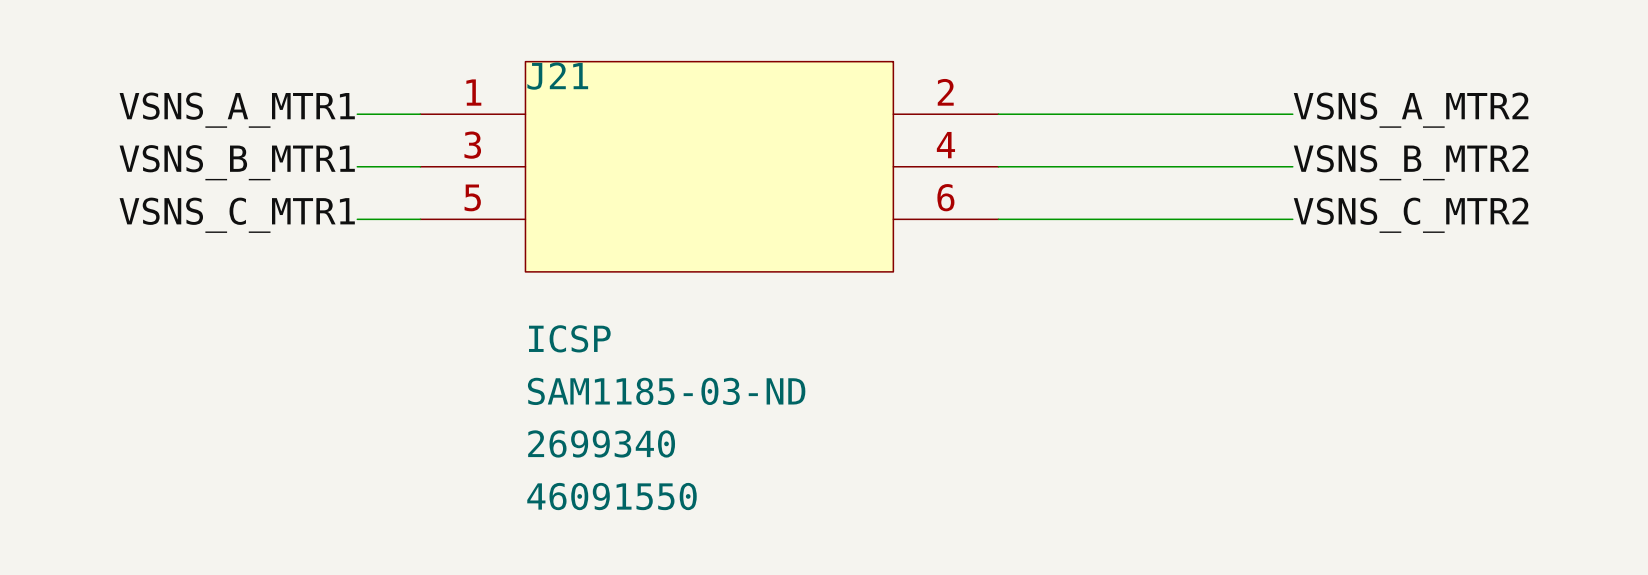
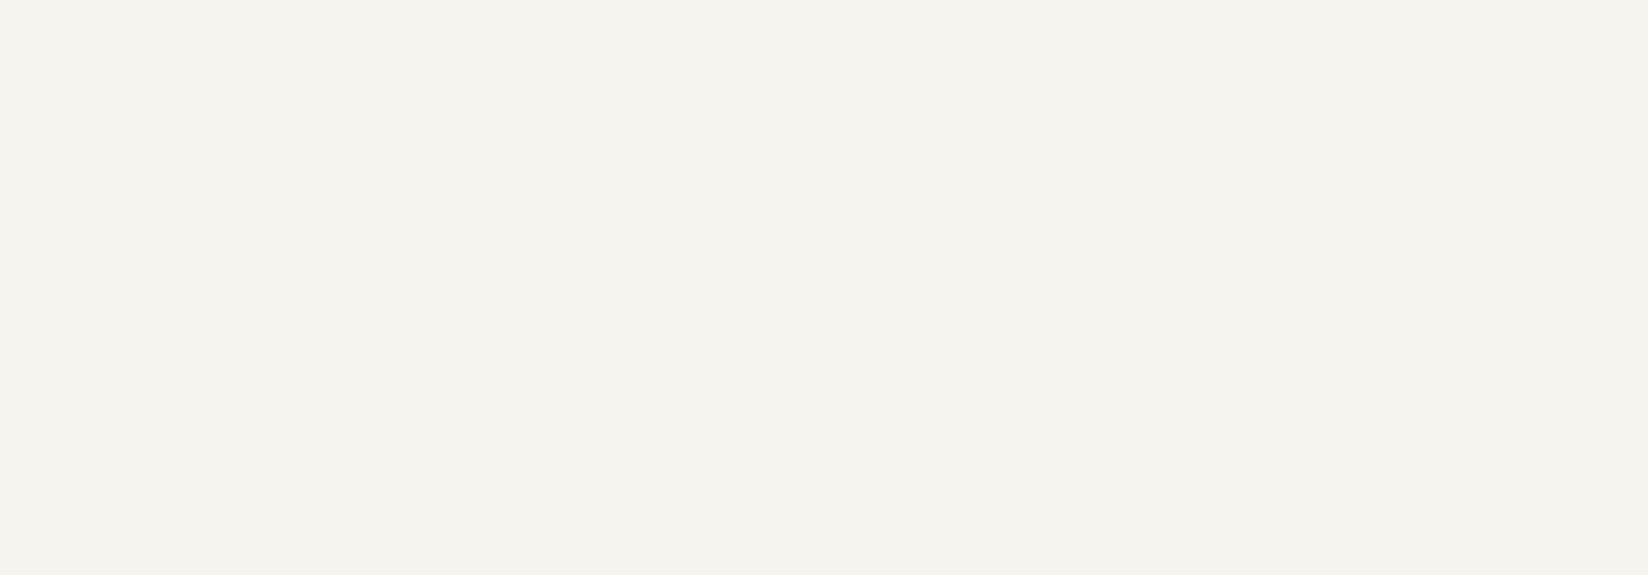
label: VSNS_A_MTR1 (237, 110) -> none
label: VSNS_A_MTR2 (1411, 110) -> none
wire: (357, 114) (420, 114) -> none
wire: (998, 114) (1292, 114) -> none
label: VSNS_B_MTR1 (237, 162) -> none
label: VSNS_B_MTR2 (1411, 162) -> none
wire: (357, 166) (420, 166) -> none
J21: ICSP (709, 166) -> none
wire: (998, 166) (1292, 166) -> none
label: VSNS_C_MTR1 (237, 215) -> none
label: VSNS_C_MTR2 (1411, 215) -> none
wire: (357, 219) (420, 219) -> none
wire: (998, 219) (1292, 219) -> none

